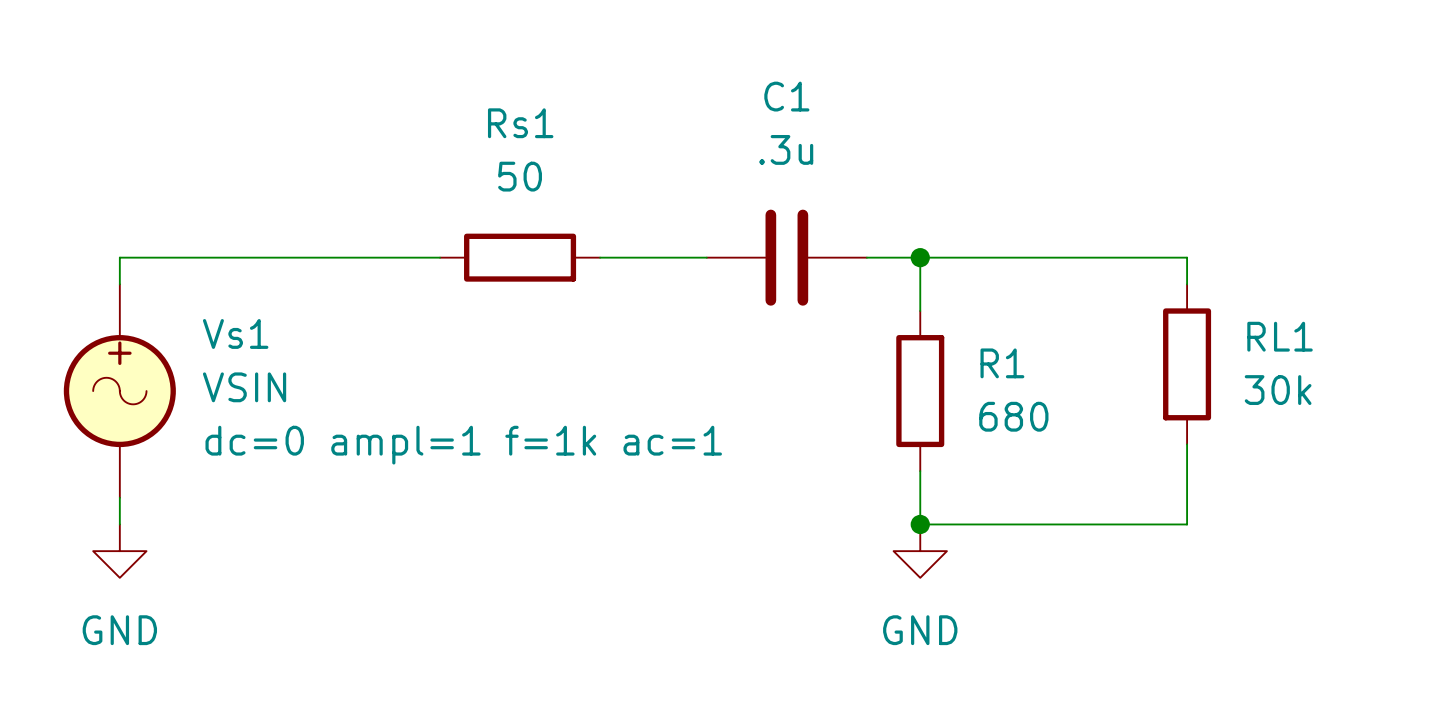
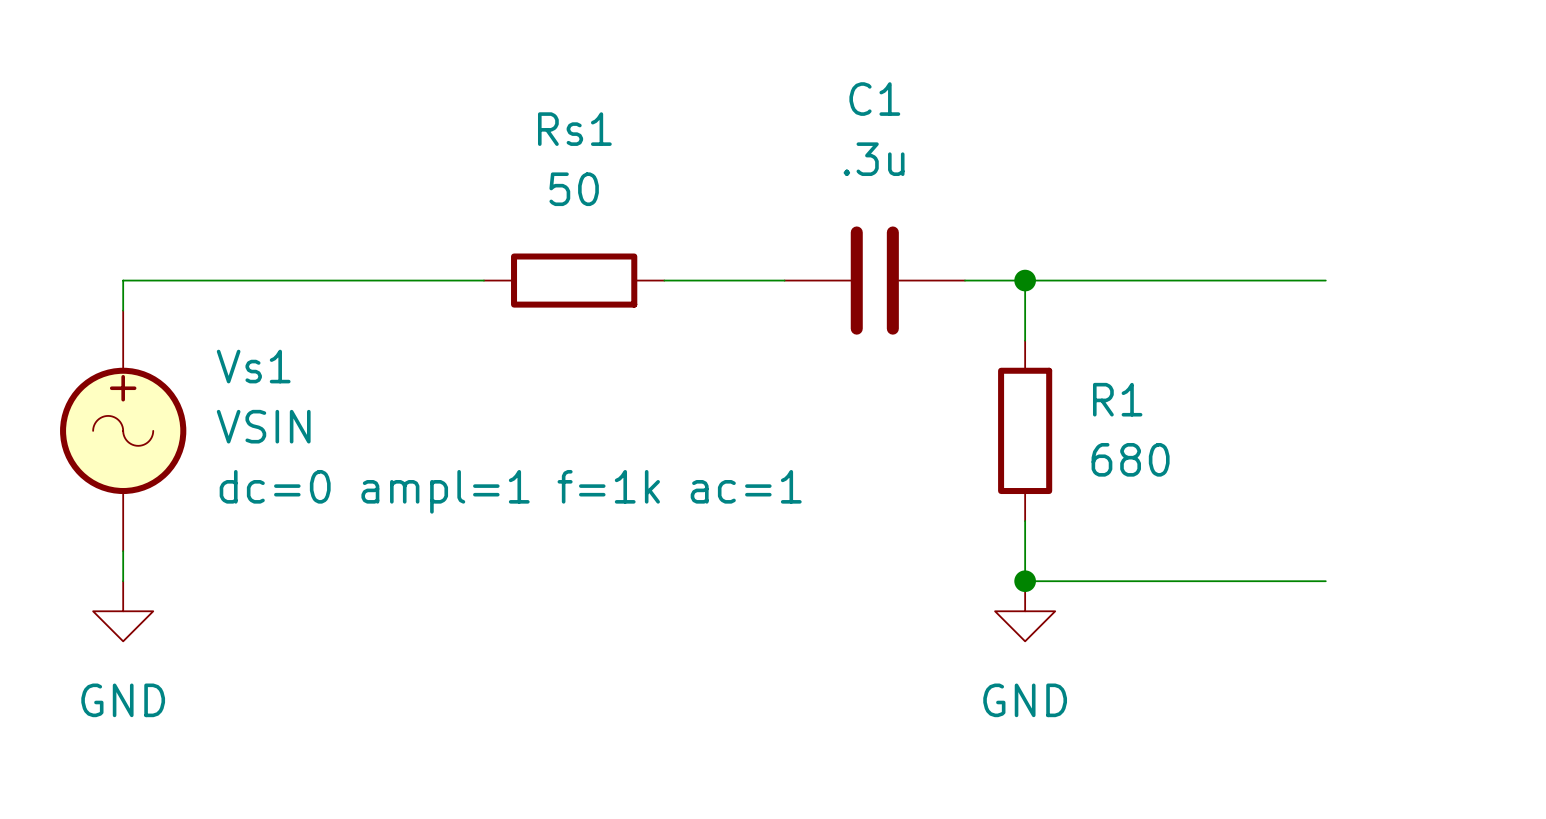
wire: (1187, 257) (1187, 284) -> none
RL1: 30k (1187, 364) -> none
wire: (1187, 444) (1187, 524) -> none

